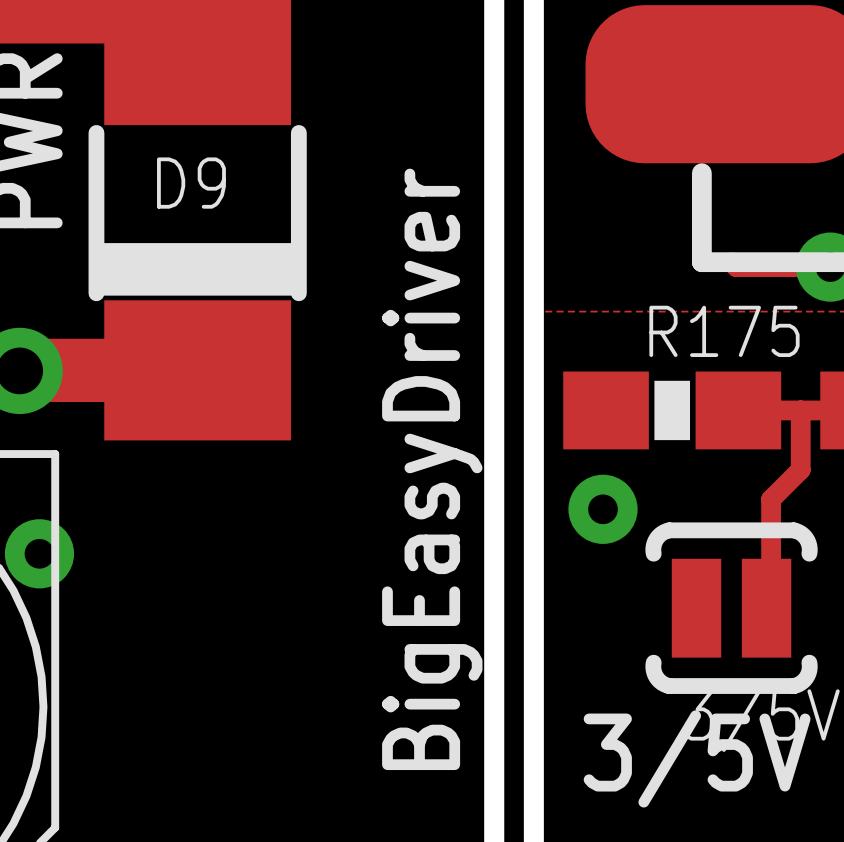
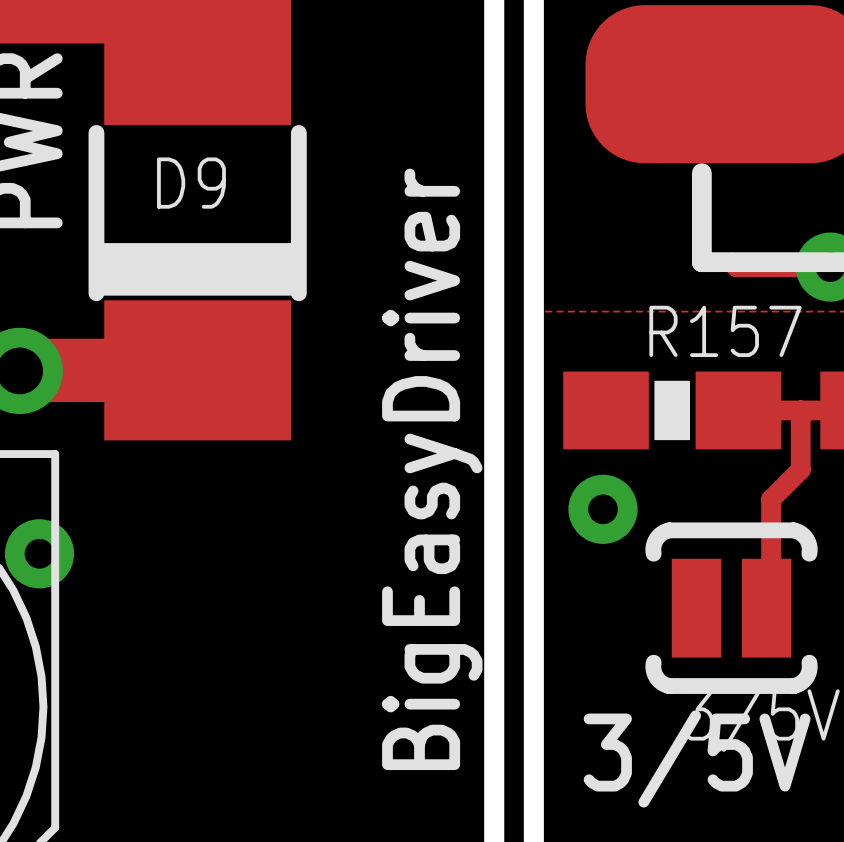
R175 name: R175 (724, 331) -> R157 (725, 331)

